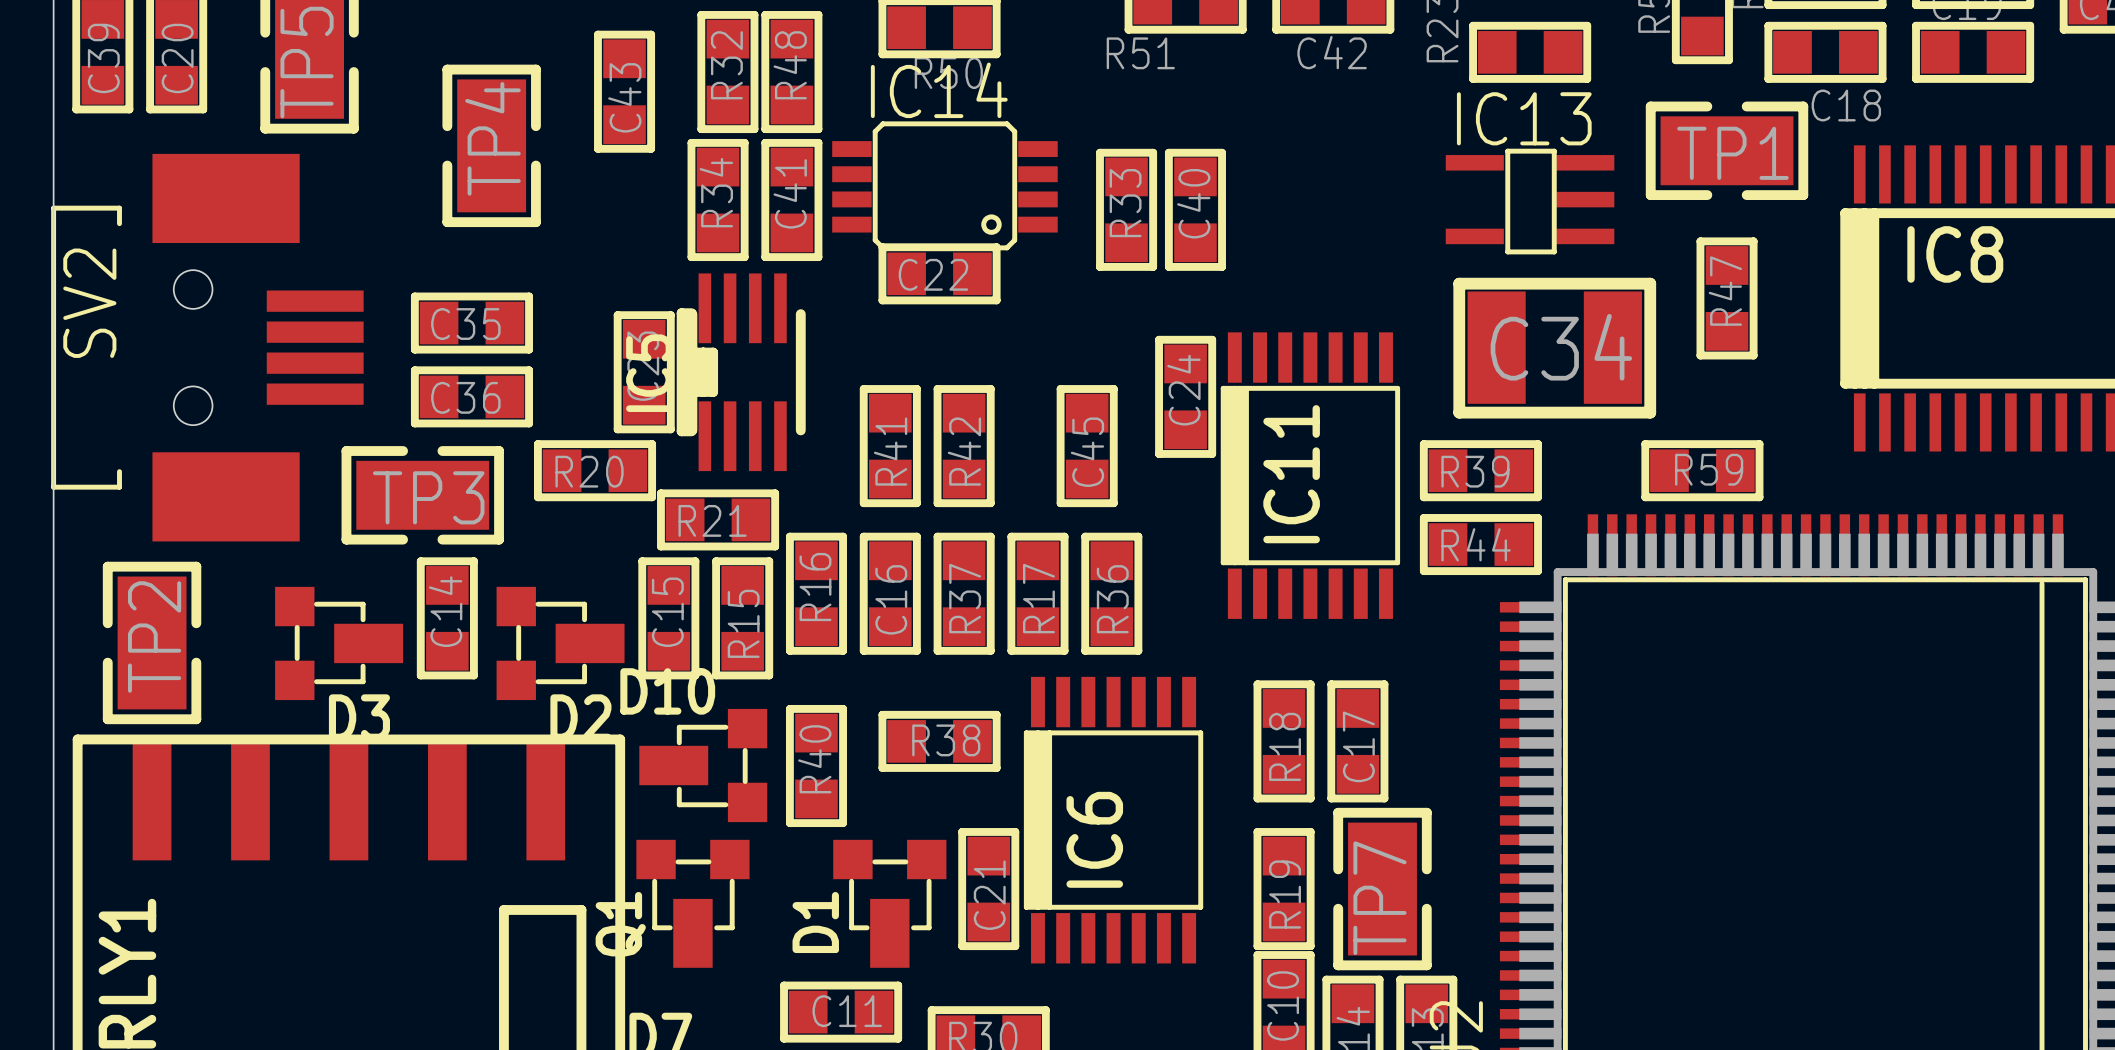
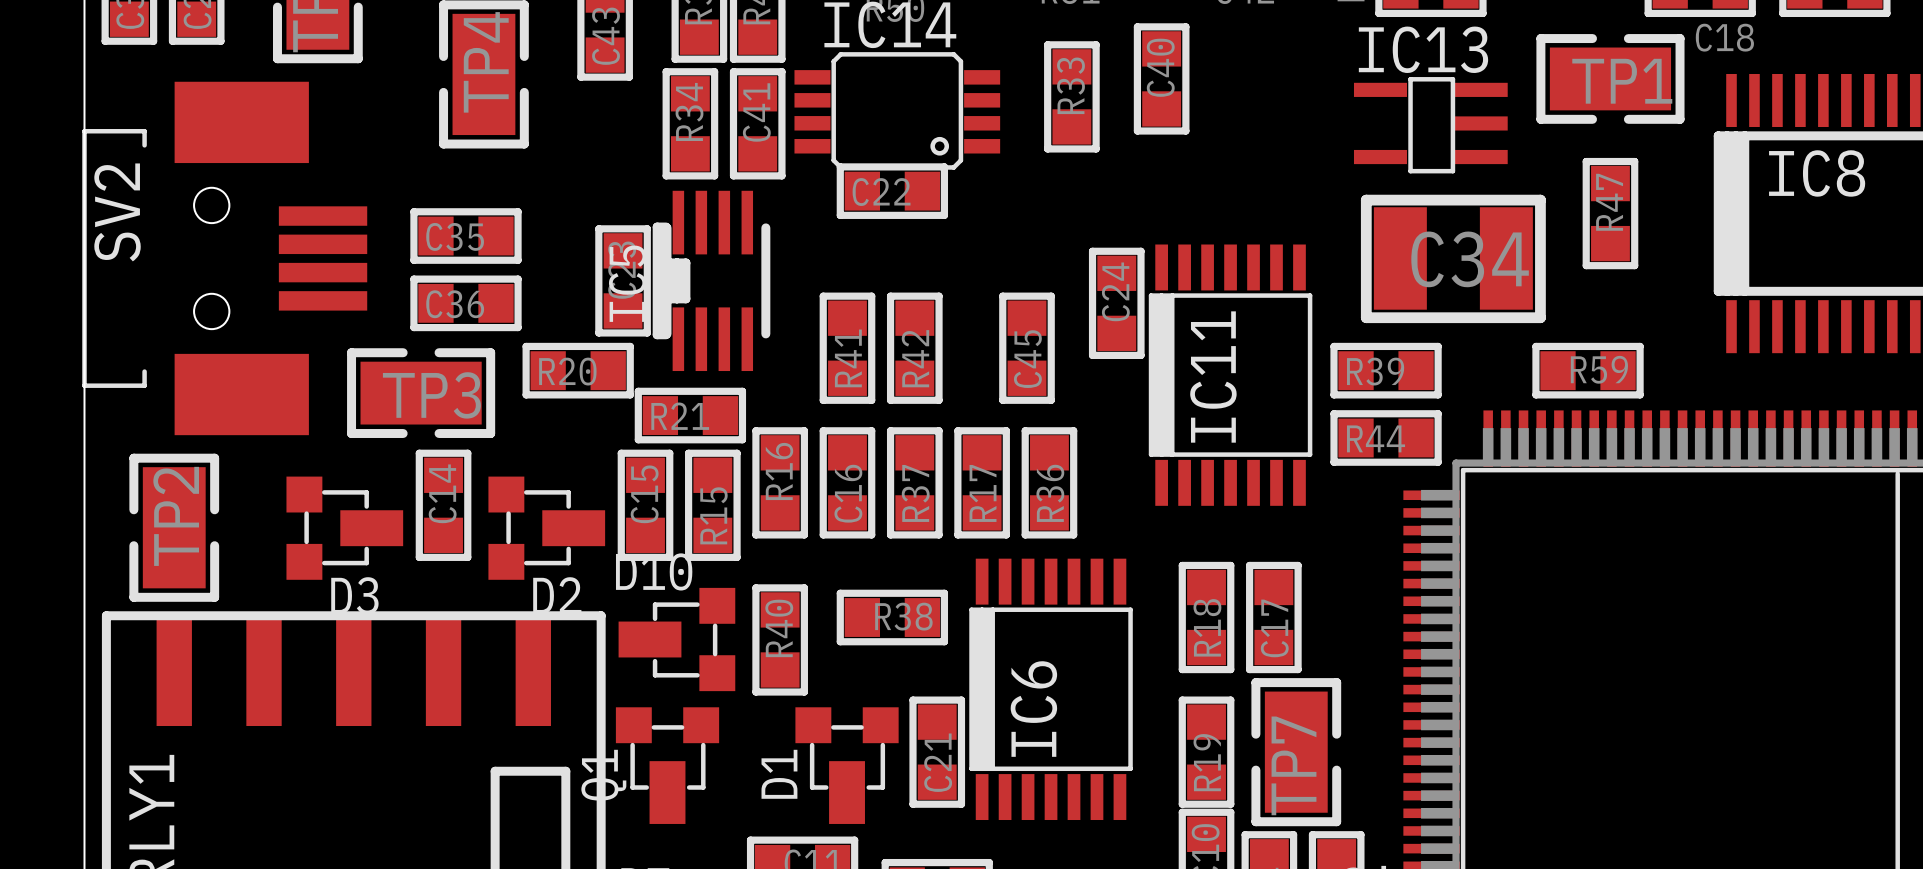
R33 position: (1126, 209) -> (1071, 96)
C40 position: (1195, 209) -> (1161, 78)

